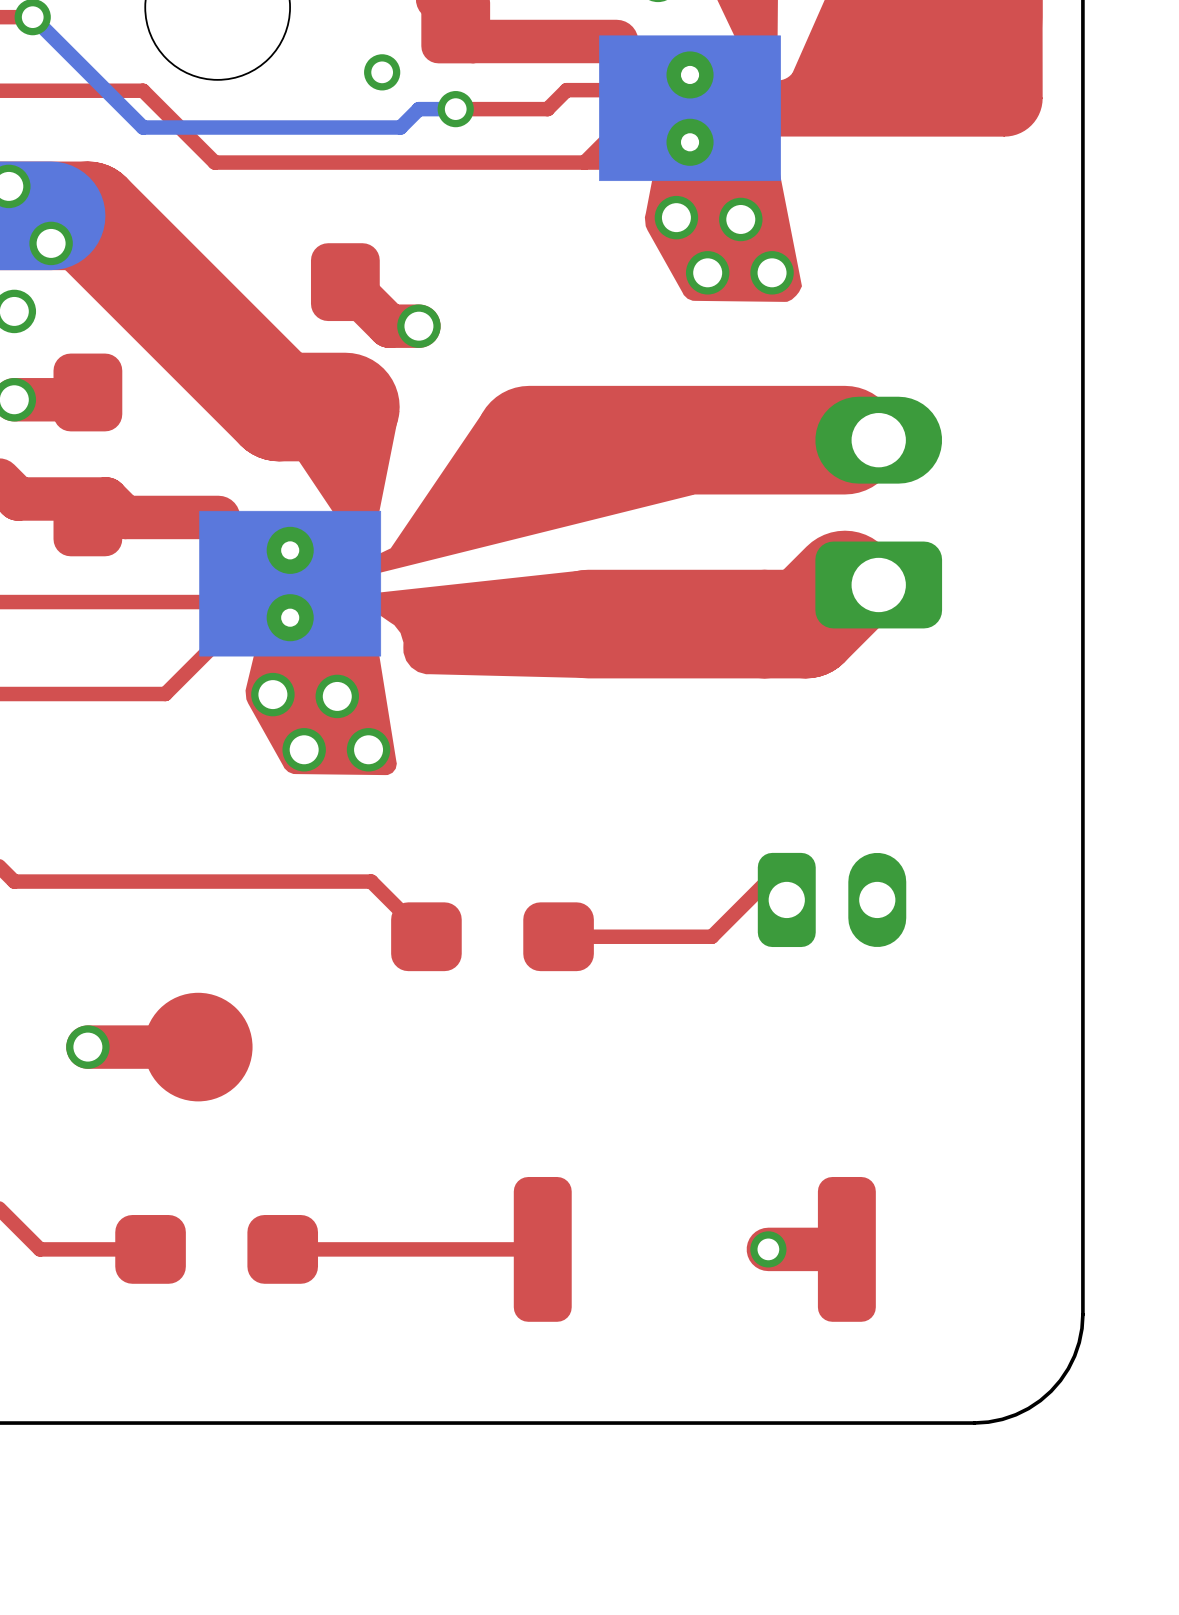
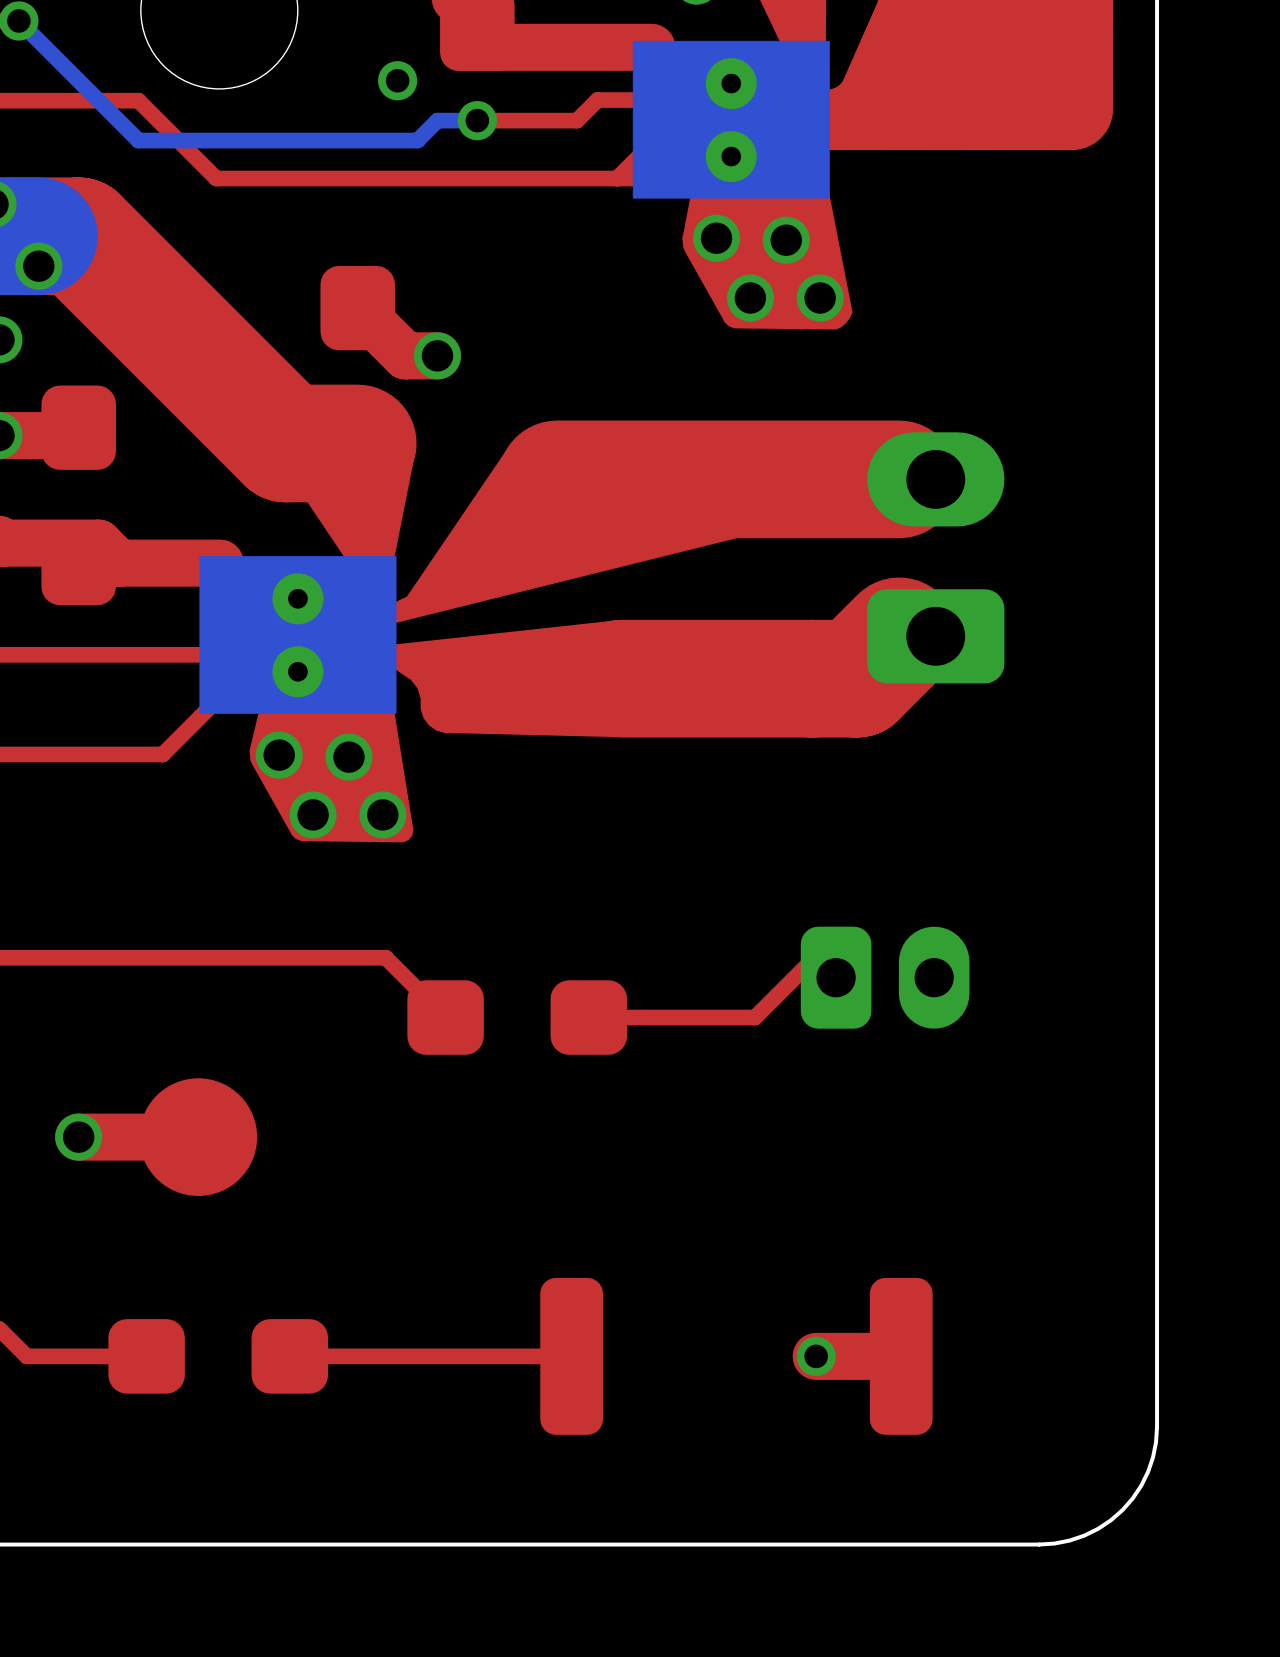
part footprint: [757, 852, 907, 948] -> [800, 926, 970, 1029]

